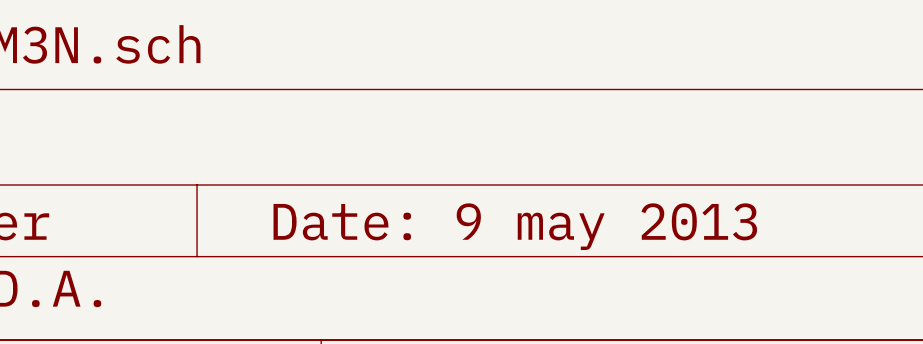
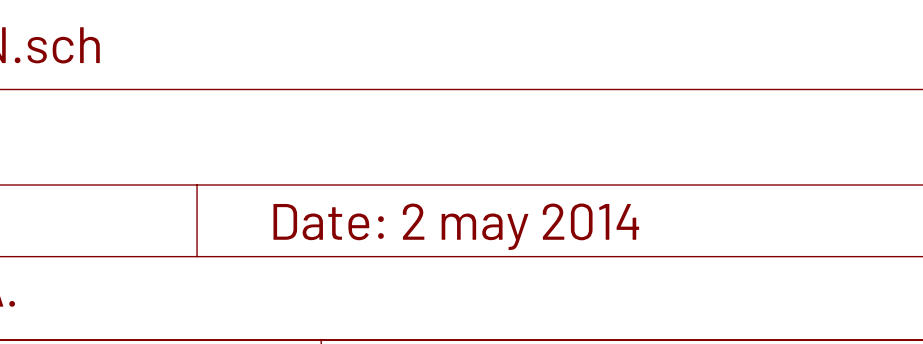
title block: Date: 9 may 2013 (515, 226) -> Date: 2 may 2014 (456, 226)

